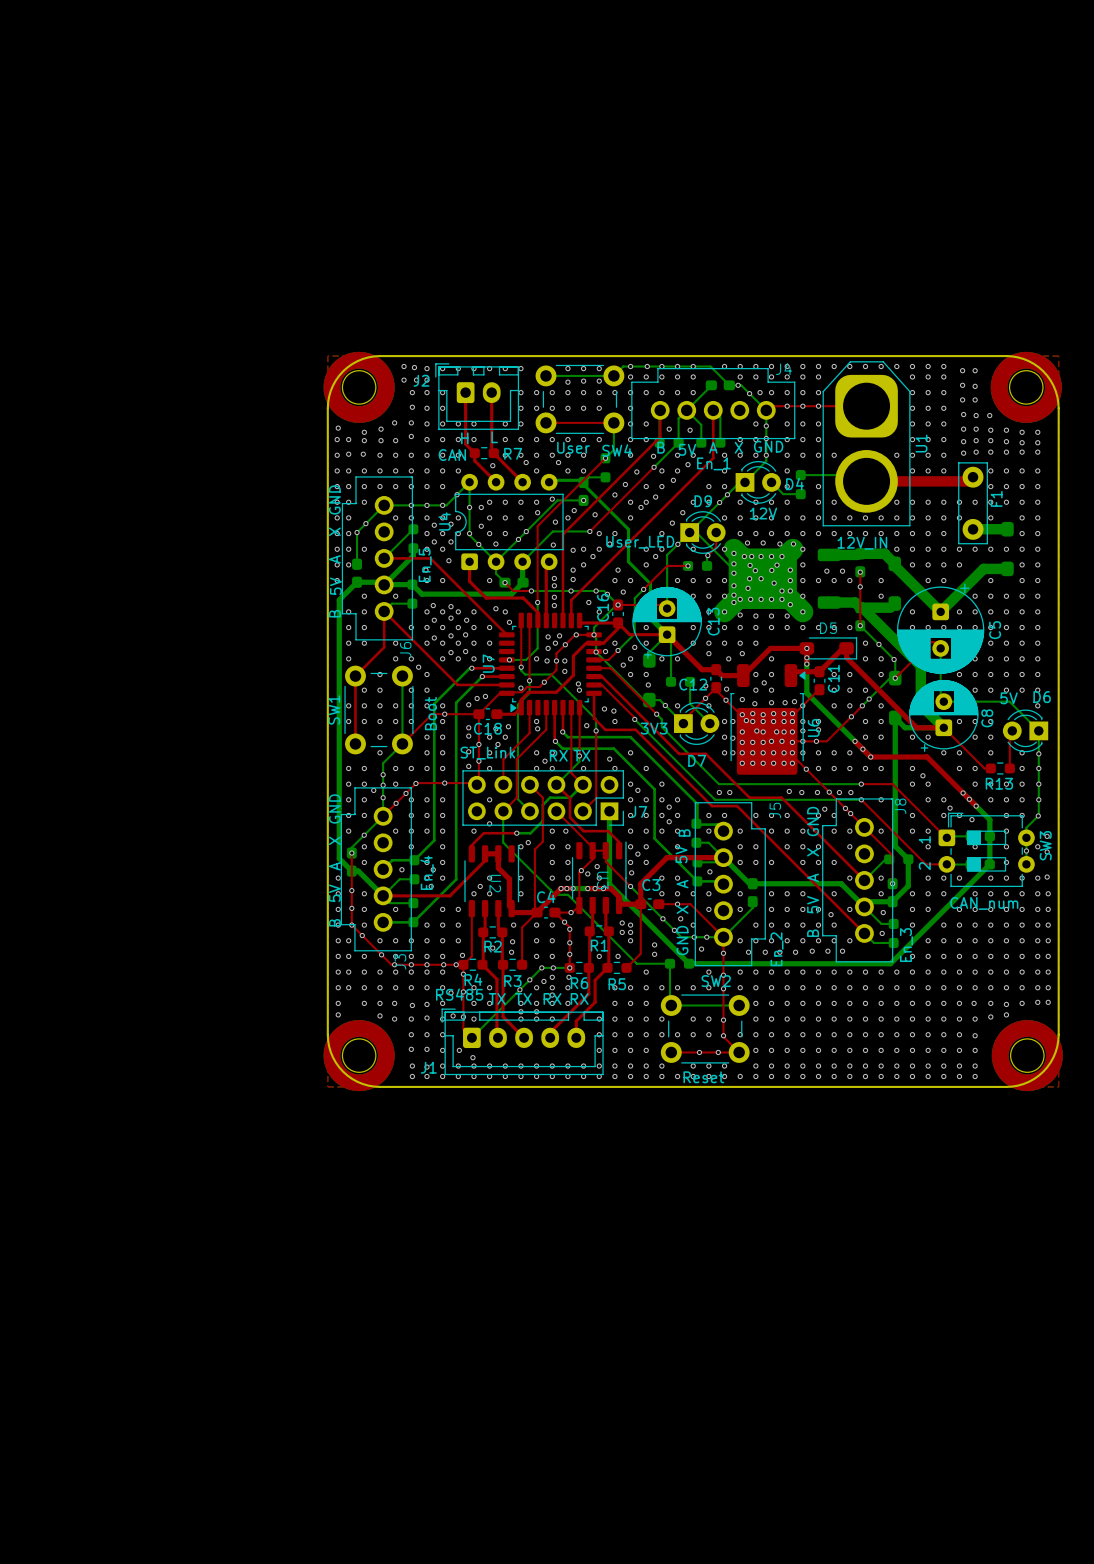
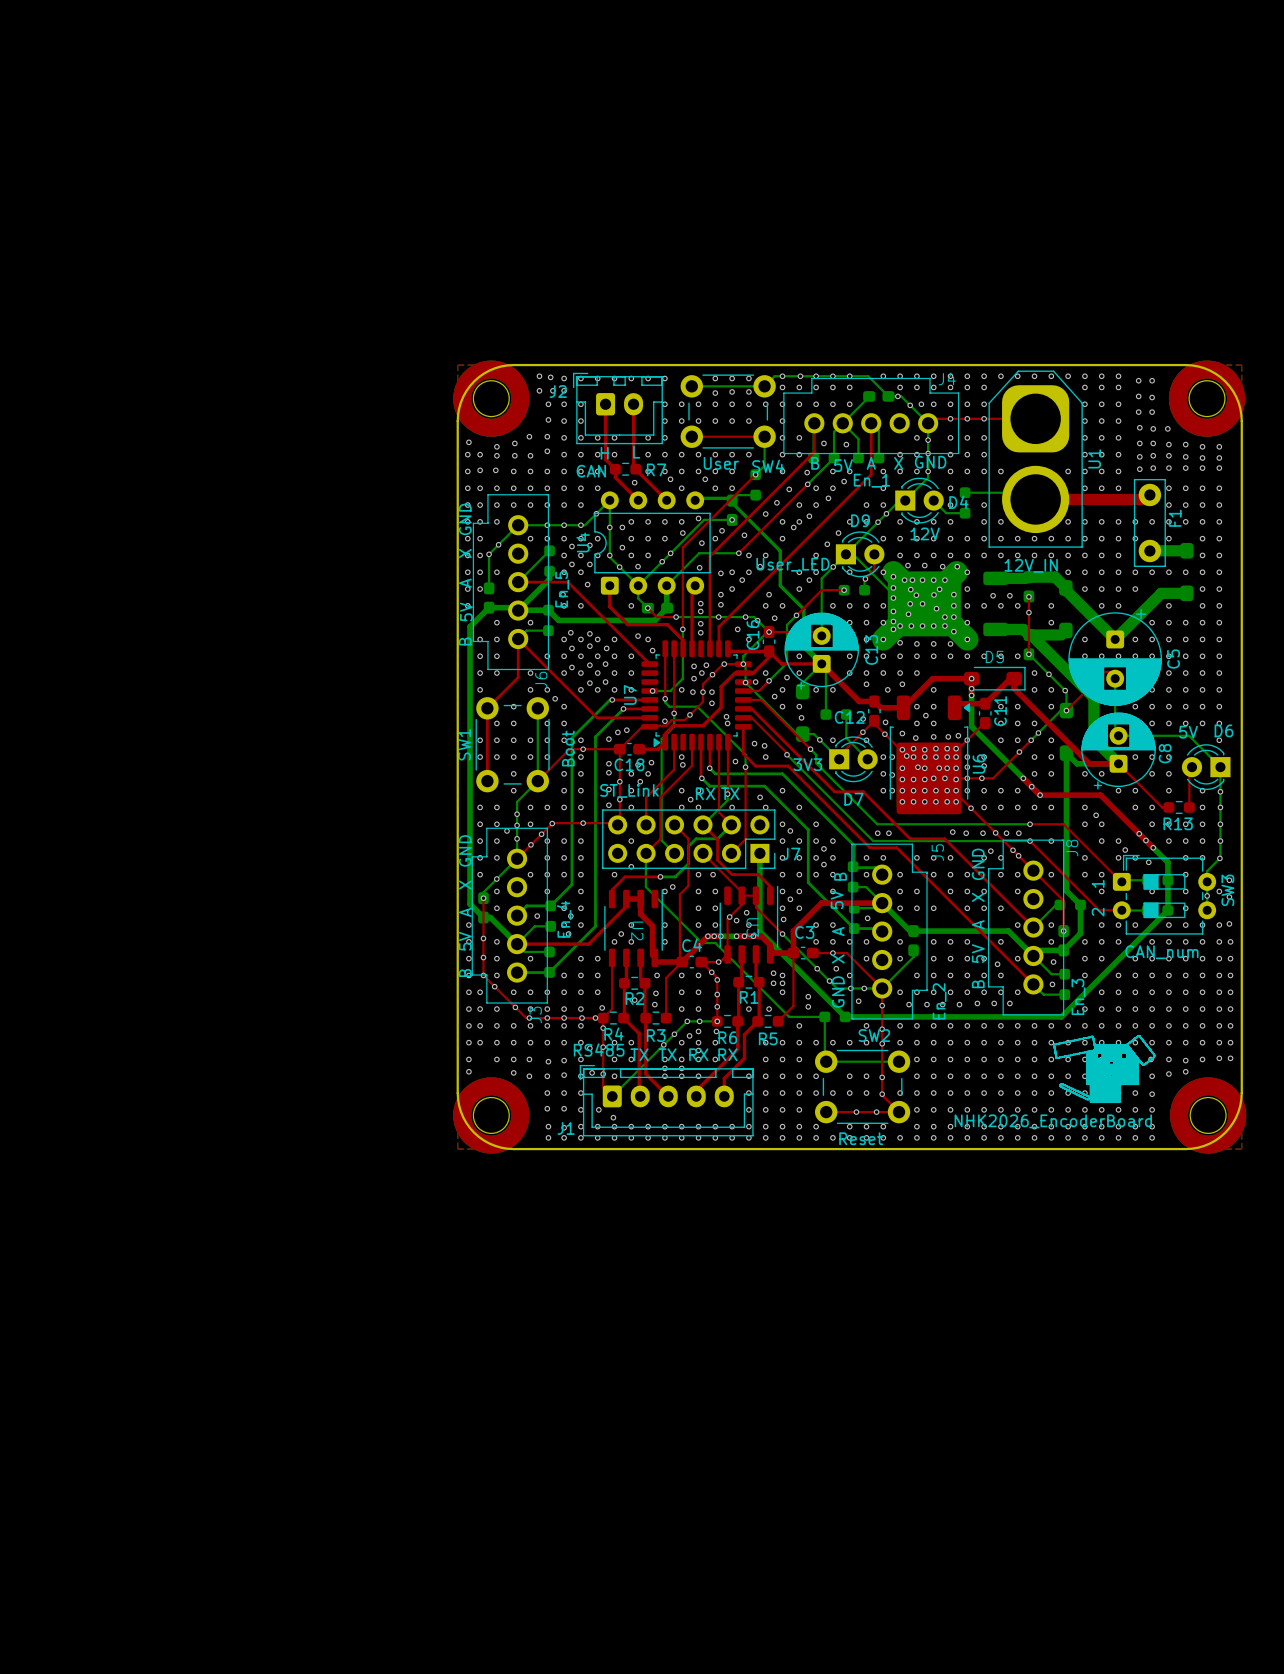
drawing: none -> [1053, 1034, 1156, 1104]
text: none -> NHK2026_EncoderBoard (1053, 1121)

